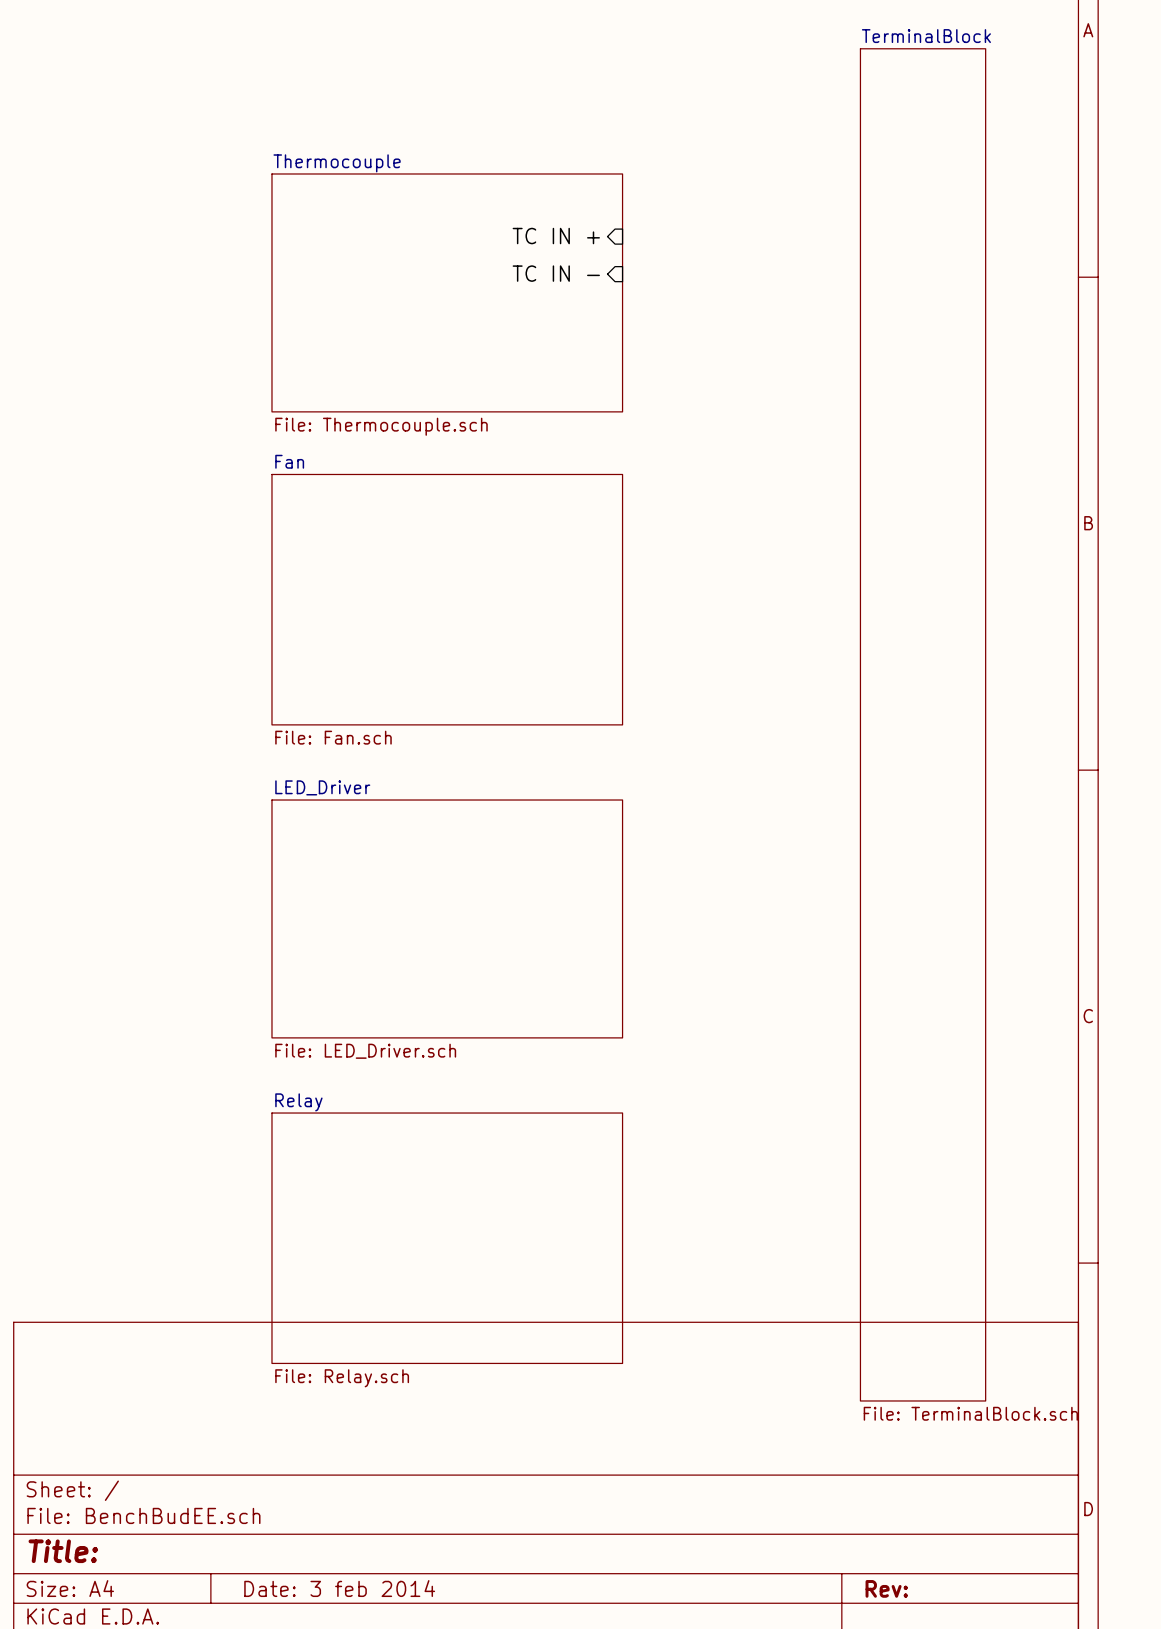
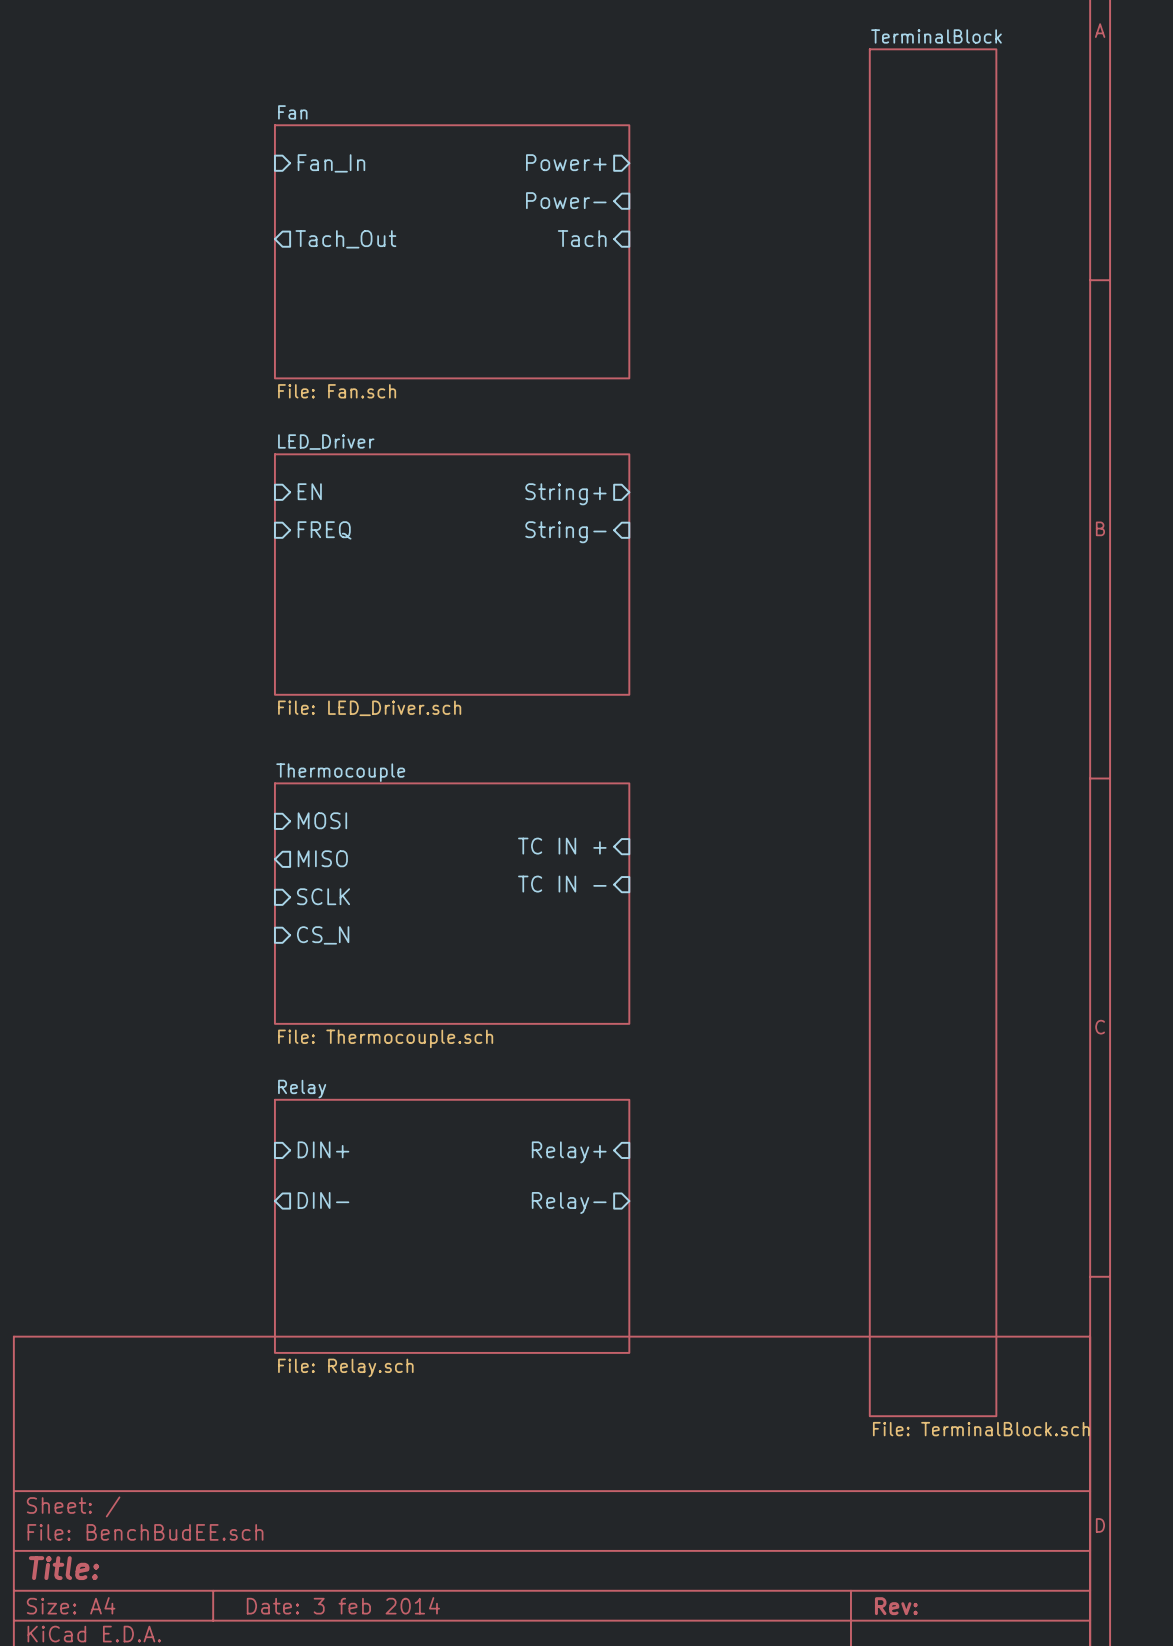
sheet pin: none -> Power+ (566, 162)
sheet pin: none -> Fan_In (331, 163)
sheet pin: none -> Power- (566, 200)
sheet pin: none -> Tach_Out (345, 239)
sheet pin: TC IN + (556, 236) -> Tach (582, 238)
sheet Fan: none -> File: Fan.sch (452, 251)
sheet pin: TC IN - (556, 273) -> none
sheet Thermocouple: File: Thermocouple.sch (447, 292) -> none
sheet pin: none -> EN (309, 491)
sheet pin: none -> String+ (565, 494)
sheet pin: none -> FREQ (324, 530)
sheet pin: none -> String- (565, 532)
sheet LED_Driver: none -> File: LED_Driver.sch (452, 574)
sheet Fan: File: Fan.sch (447, 599) -> none
sheet pin: none -> MOSI (322, 820)
sheet pin: none -> TC IN + (562, 846)
sheet pin: none -> MISO (322, 858)
sheet pin: none -> TC IN - (562, 884)
sheet pin: none -> SCLK (323, 896)
sheet Thermocouple: none -> File: Thermocouple.sch (452, 903)
sheet LED_Driver: File: LED_Driver.sch (447, 918) -> none
sheet pin: none -> CS_N (323, 935)
sheet pin: none -> DIN+ (323, 1149)
sheet pin: none -> Relay+ (569, 1152)
sheet pin: none -> DIN- (323, 1200)
sheet pin: none -> Relay- (569, 1203)
sheet Relay position: (447, 1238) -> (452, 1226)

